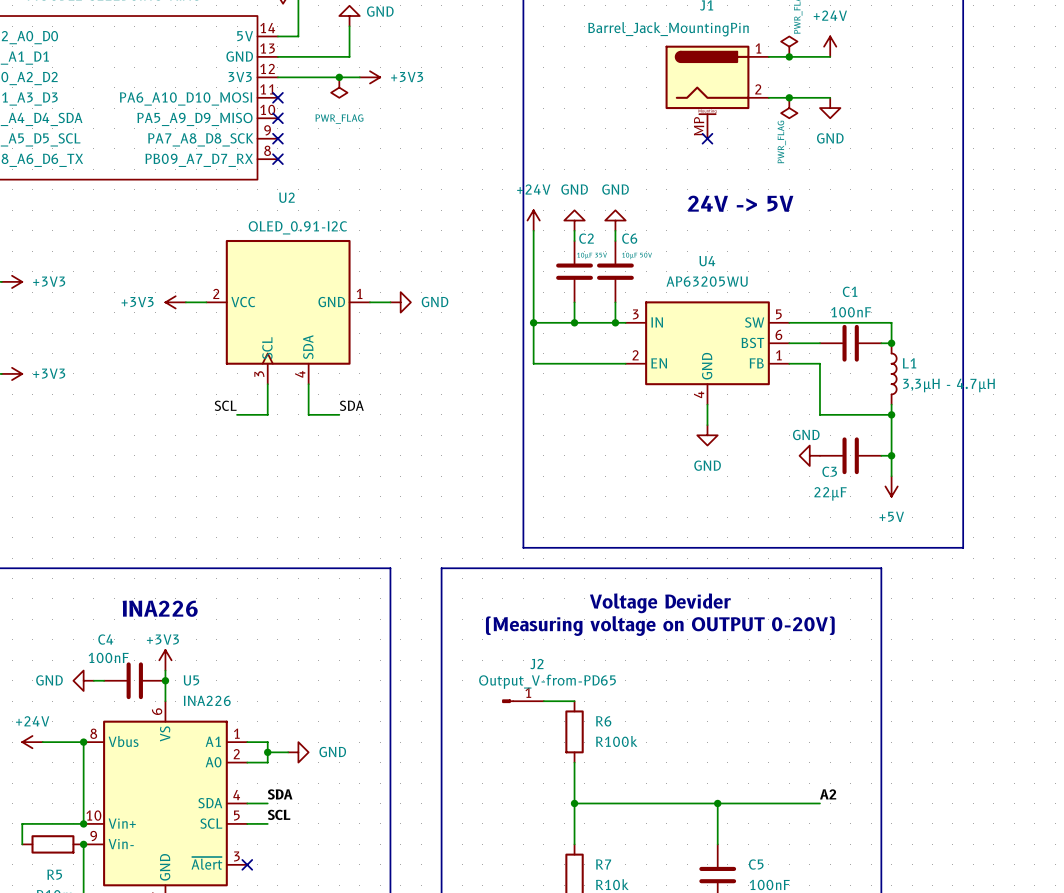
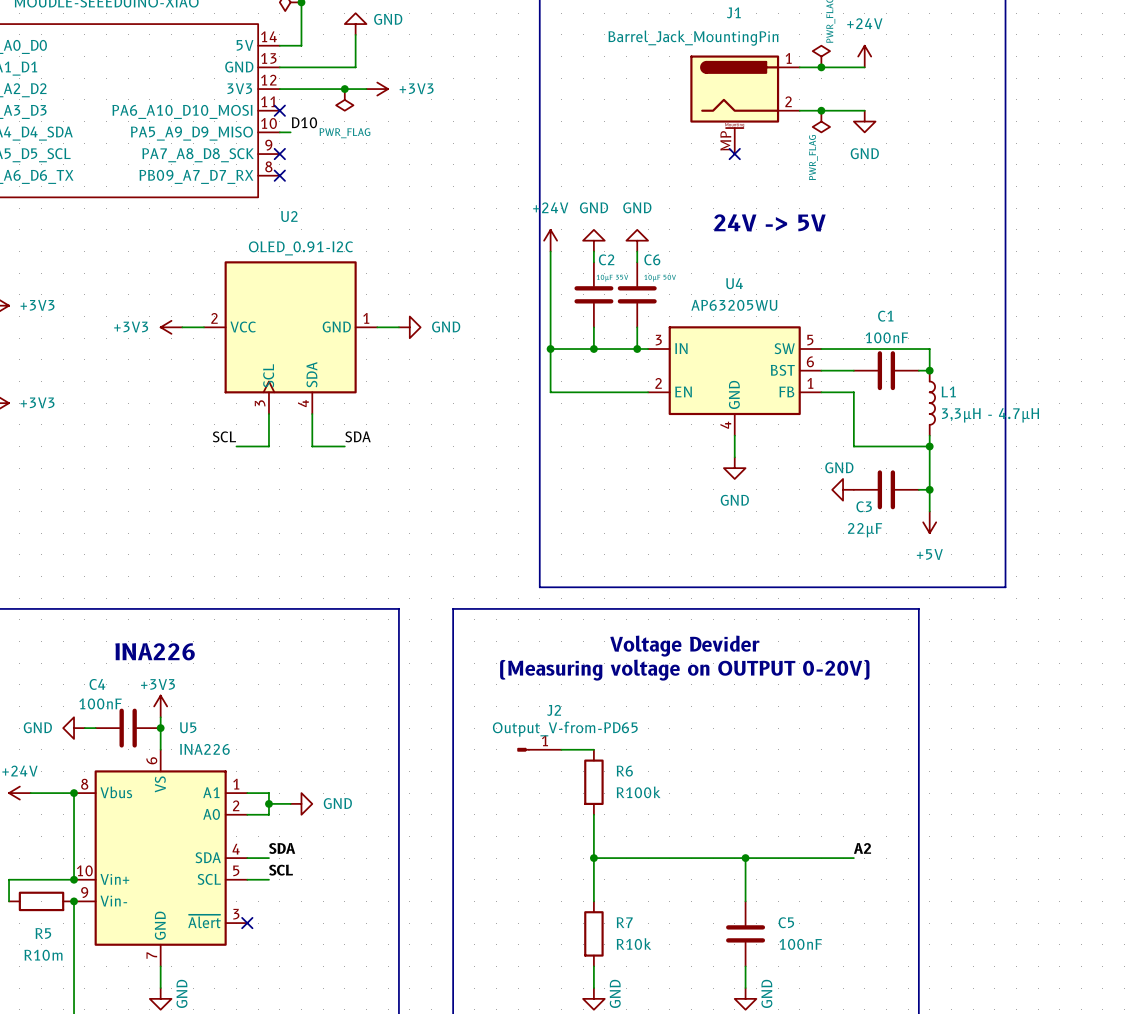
label: none -> D10 (304, 122)
wire: none -> (279, 132) (290, 132)
no-connect mark: (277, 118) -> none

